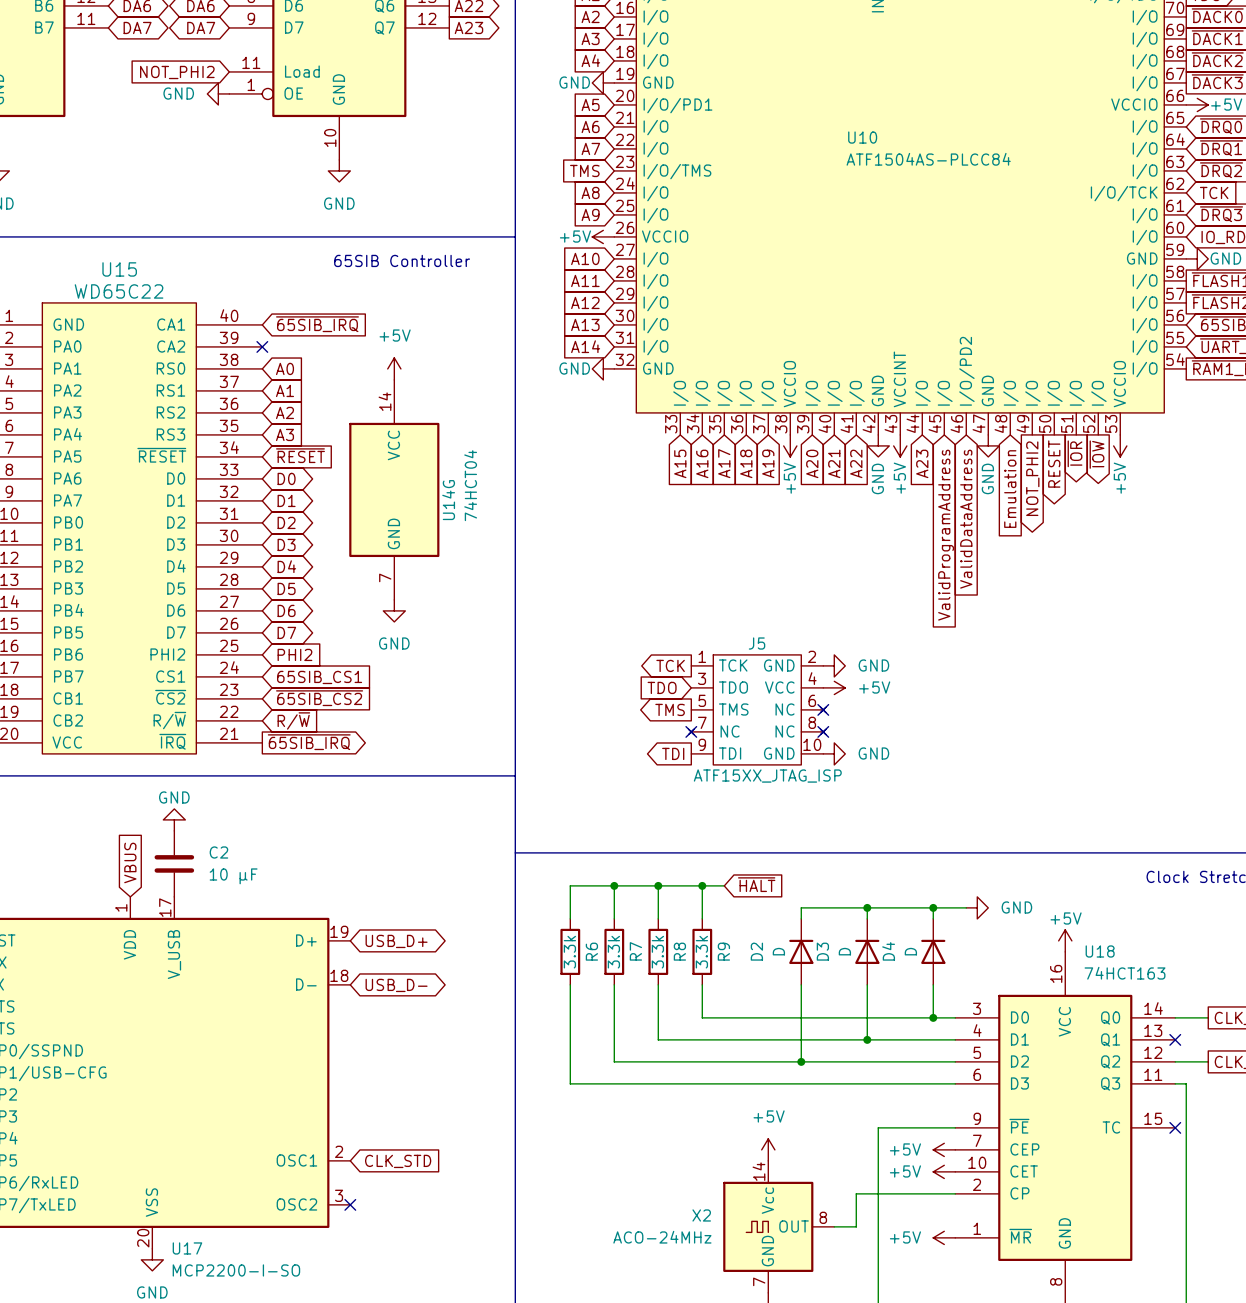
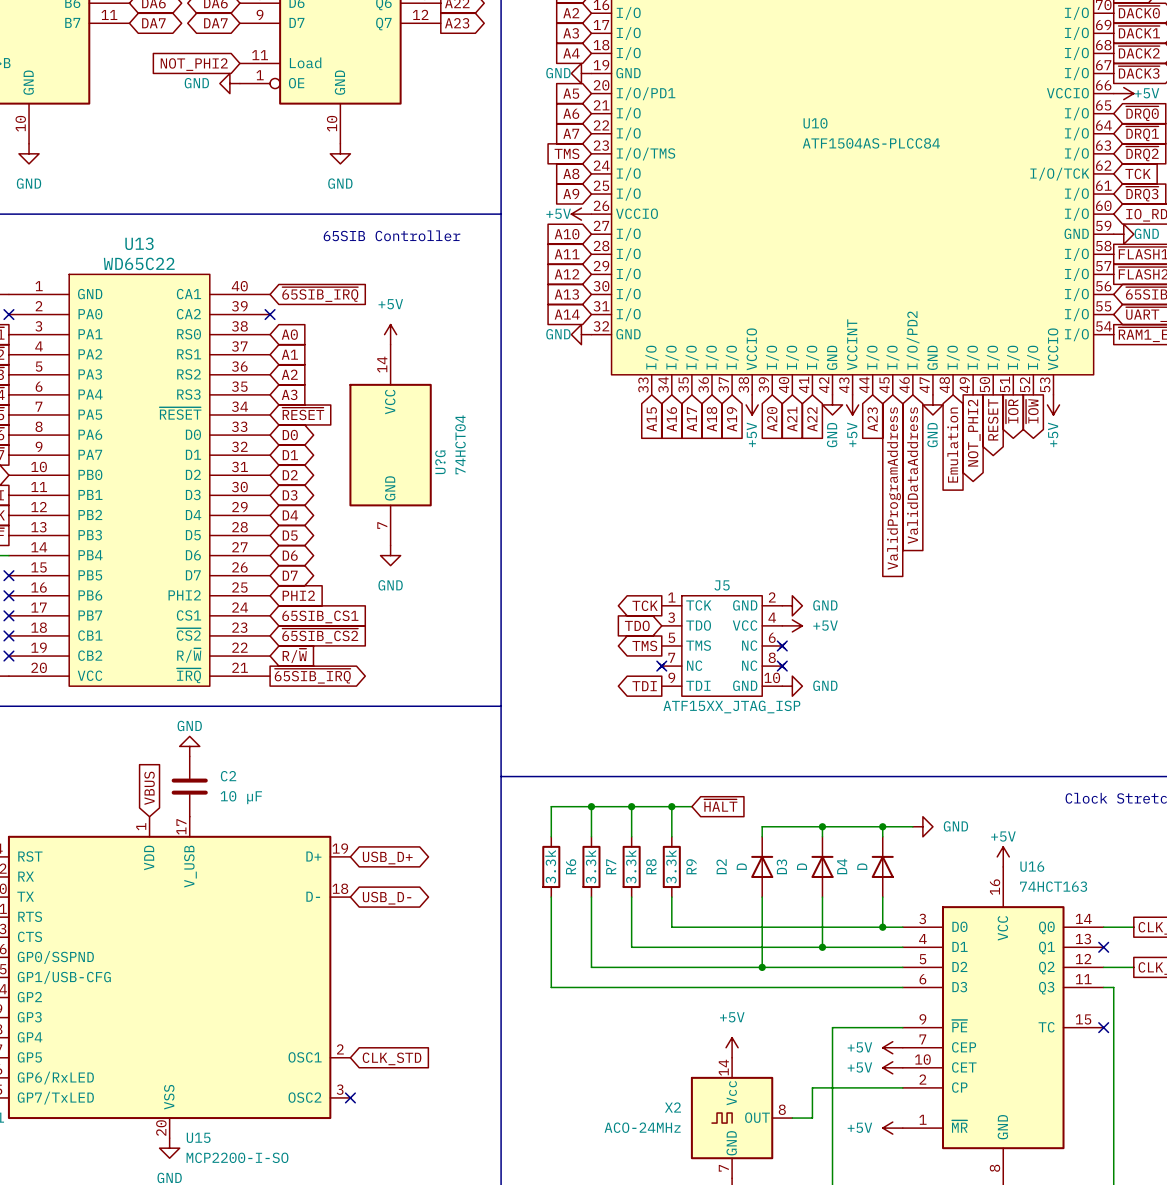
U15 name: U15 (119, 269) -> U13 (139, 243)
U14G name: U14G (448, 500) -> U?G (440, 462)
U18 name: U18 (1100, 951) -> U16 (1032, 866)
U17 name: U17 (187, 1248) -> U15 (198, 1137)

